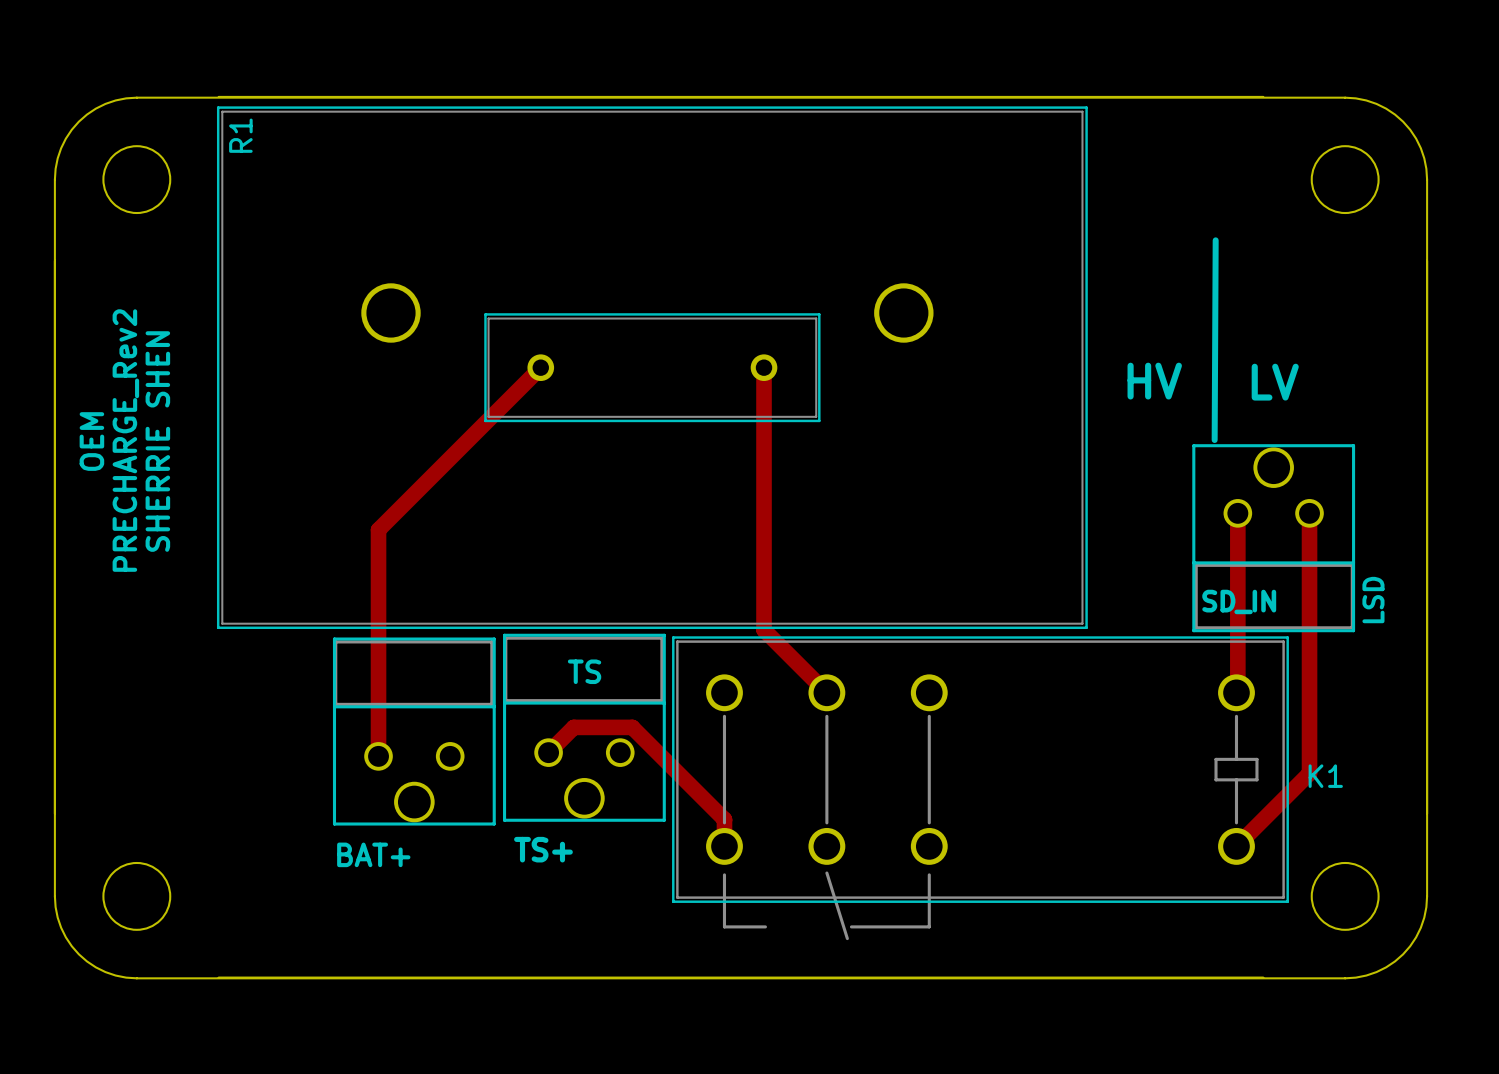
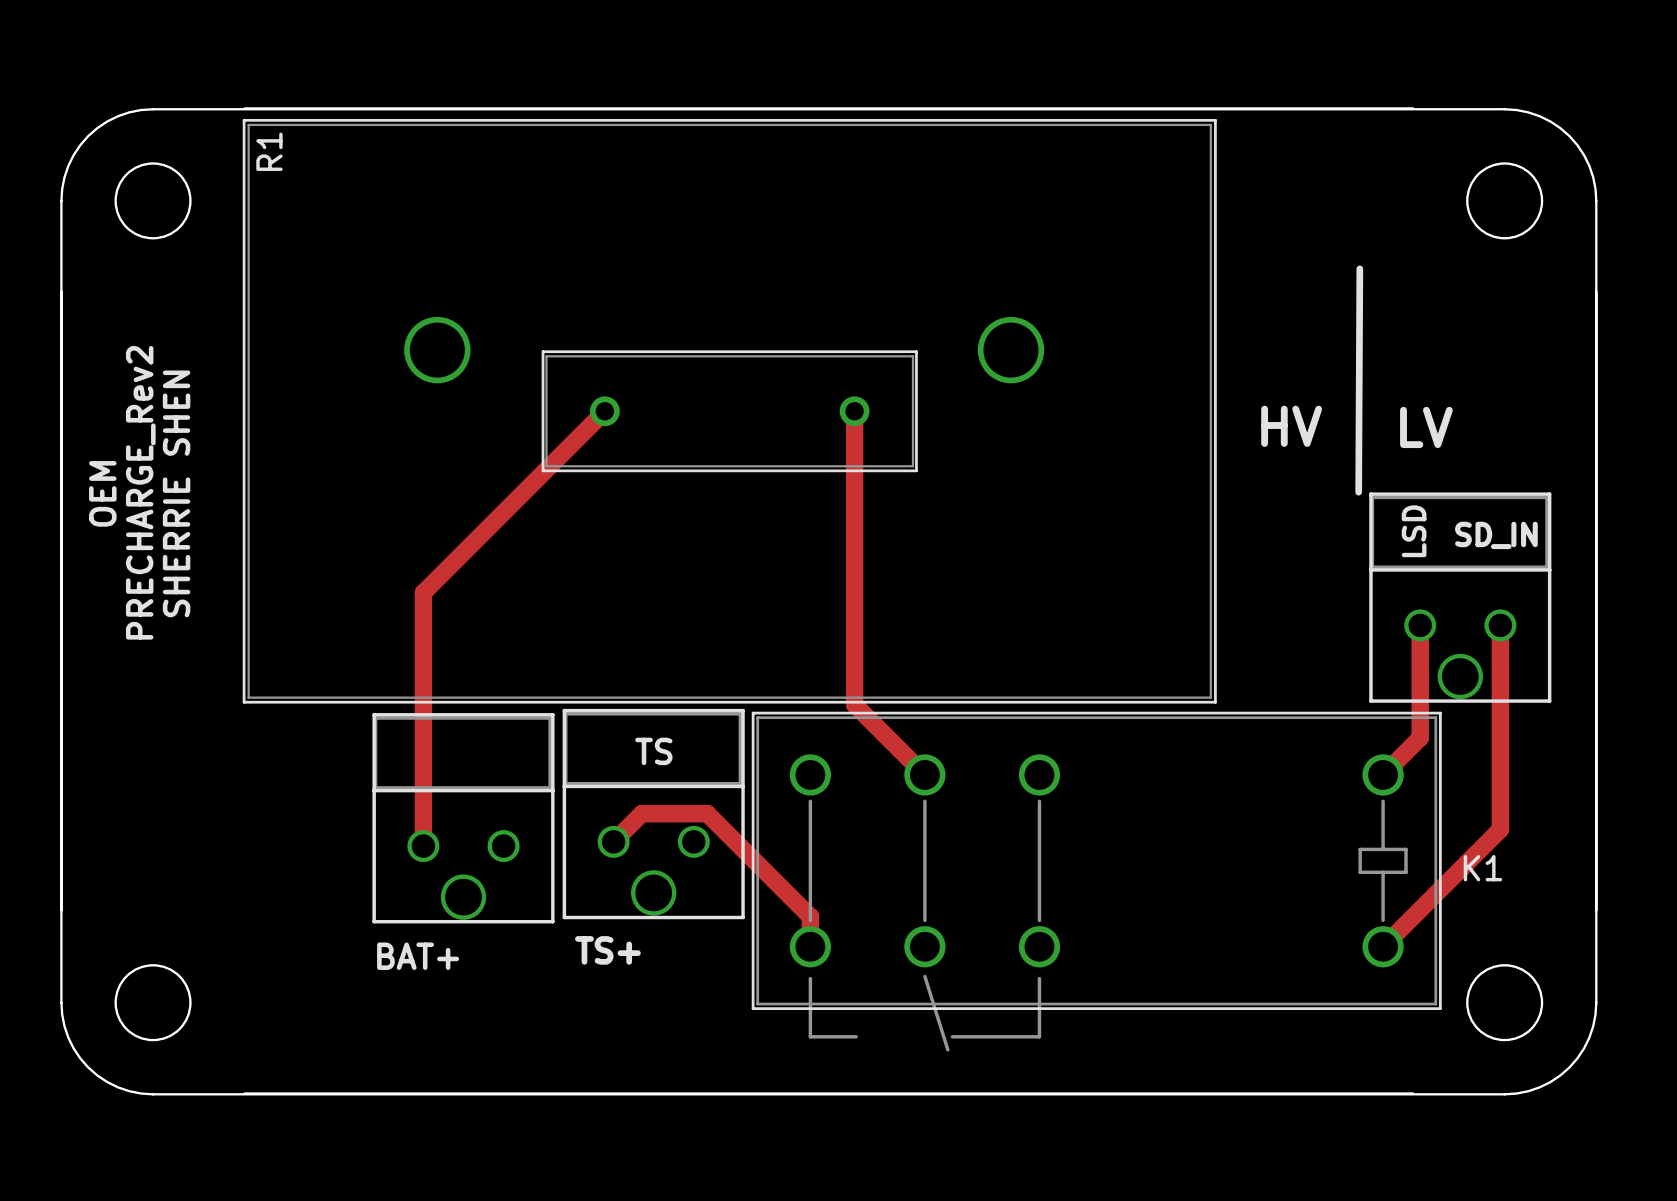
top track: (1237, 513) (1237, 691) -> (1420, 625) (1420, 737) (1384, 773)
top track: (1309, 513) (1309, 773) -> (1500, 625) (1500, 829) (1464, 865)
part rotation: 0° (1273, 538) -> 180° (1460, 597)
text position: LSD (1373, 600) -> LSD (1414, 531)
text position: SD_IN (1239, 601) -> SD_IN (1496, 535)

